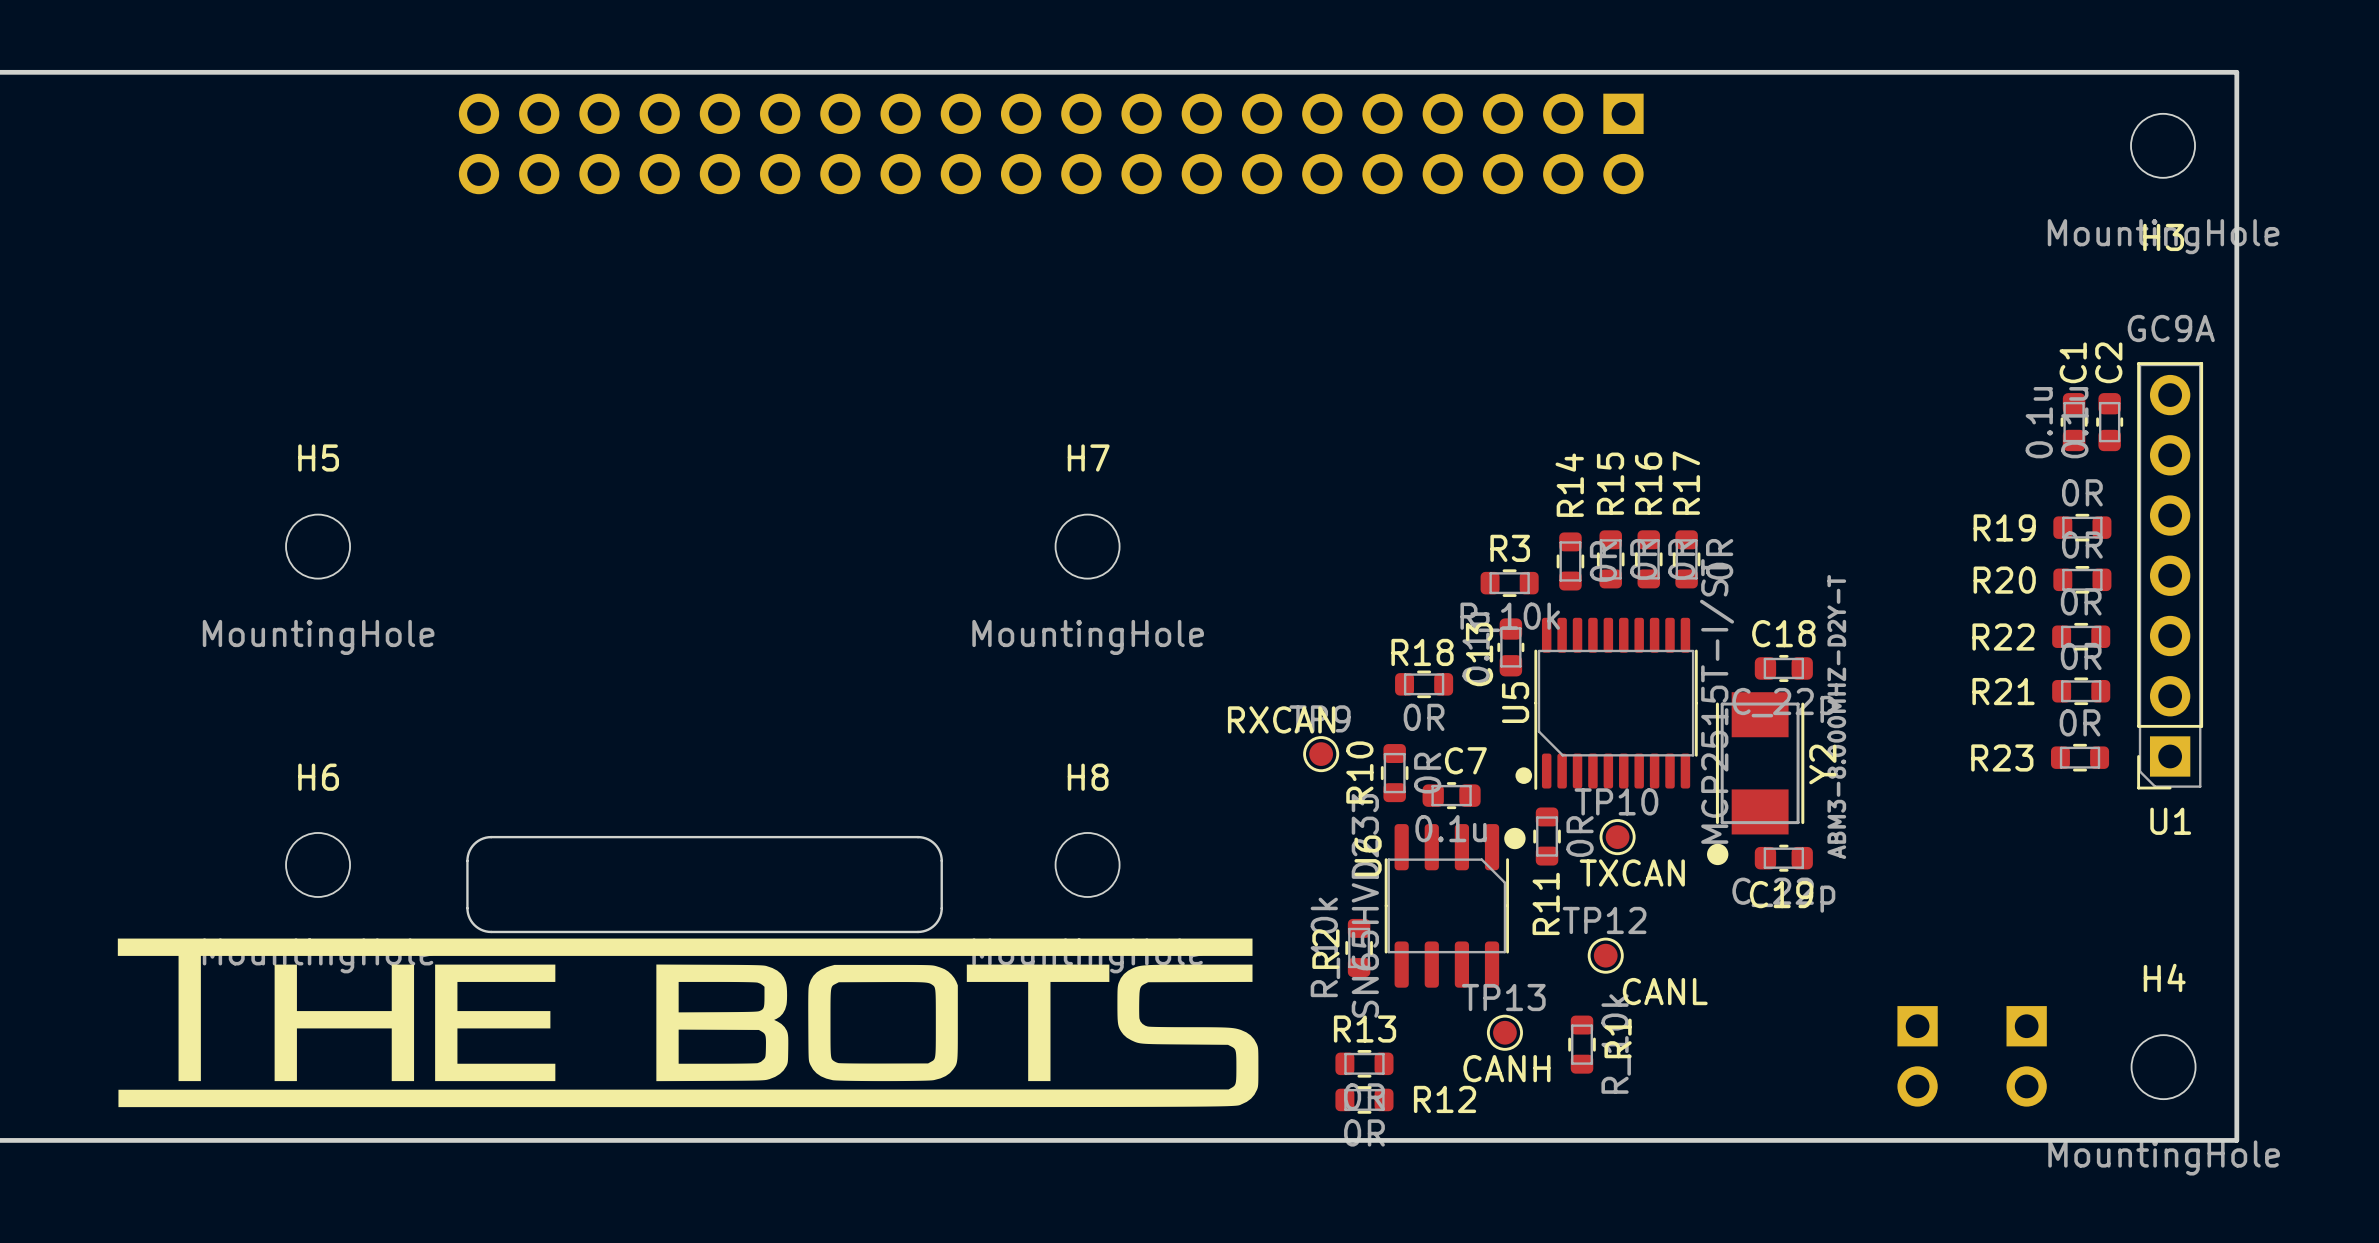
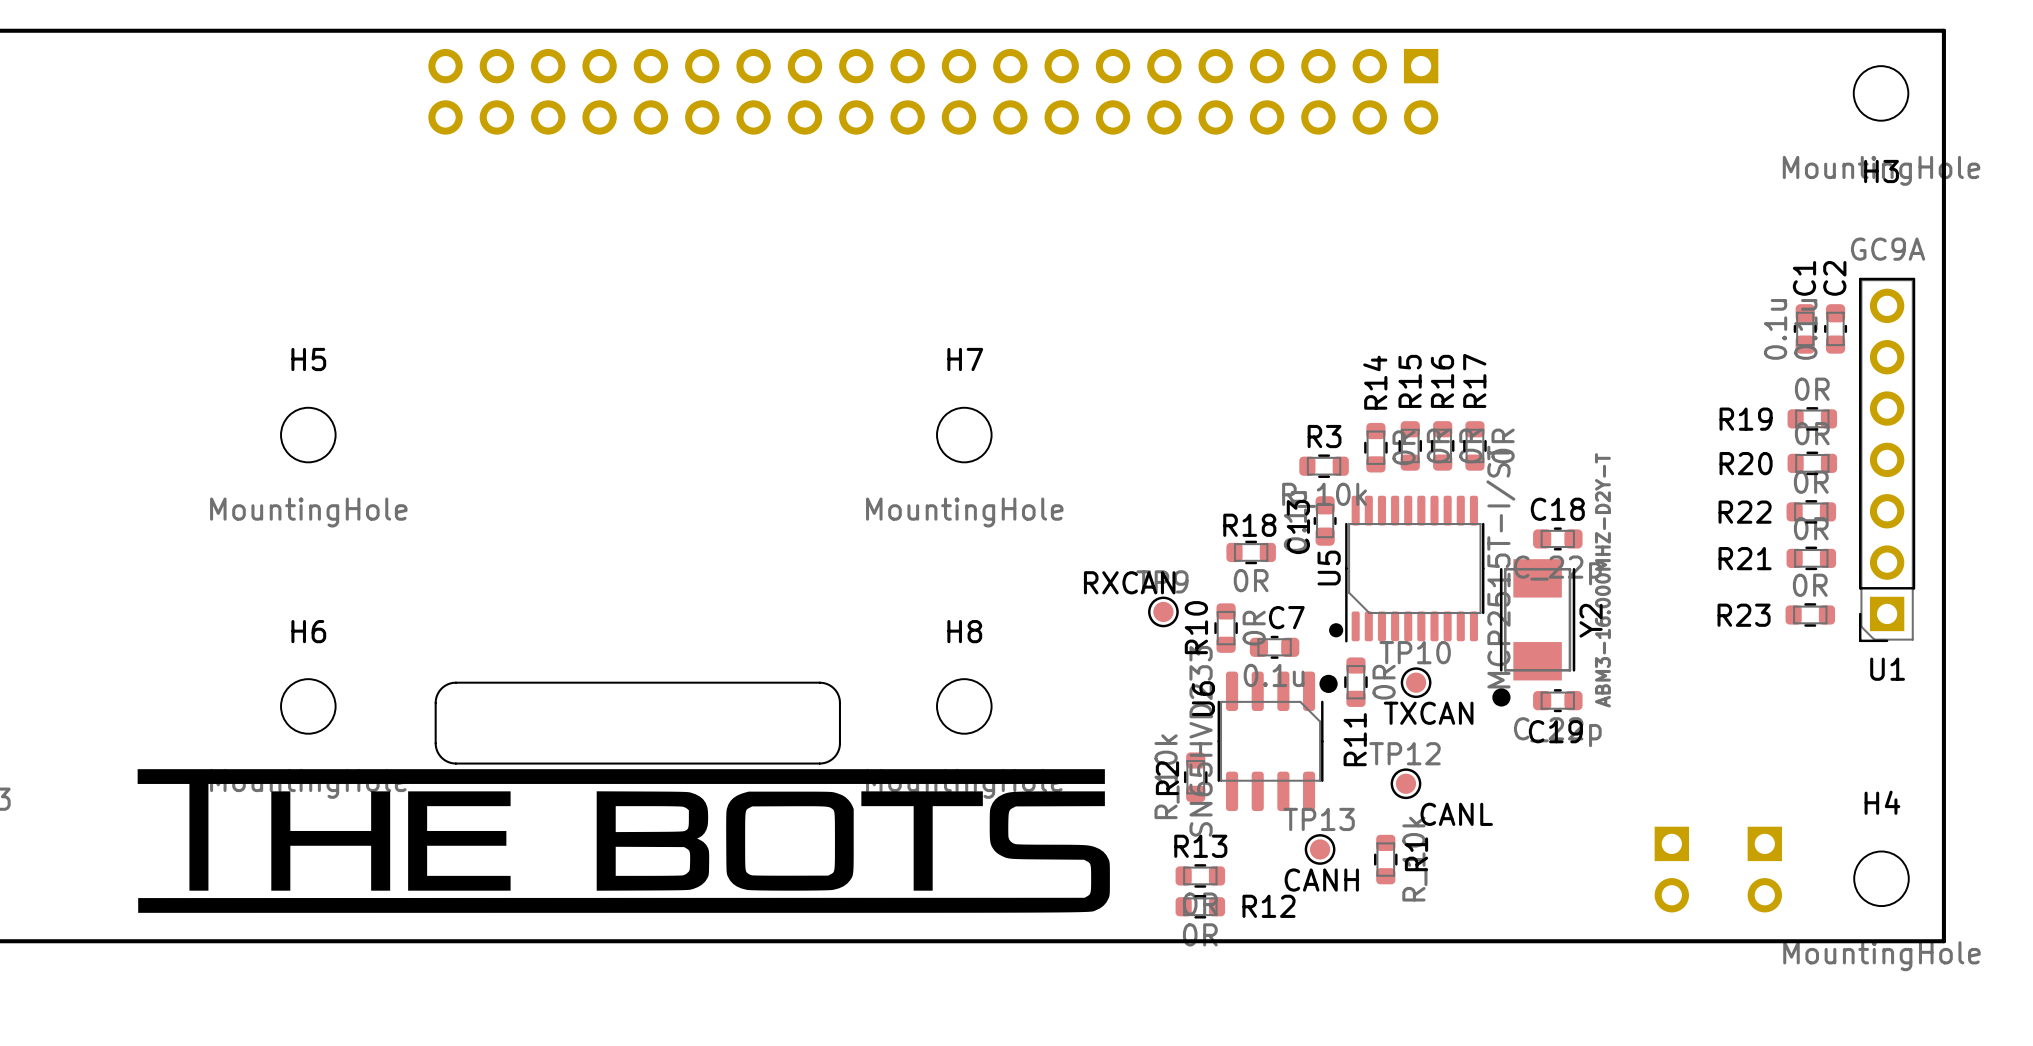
Y2 value: ABM3-8.000MHZ-D2Y-T (1836, 717) -> ABM3-16.000MHZ-D2Y-T (1602, 580)

